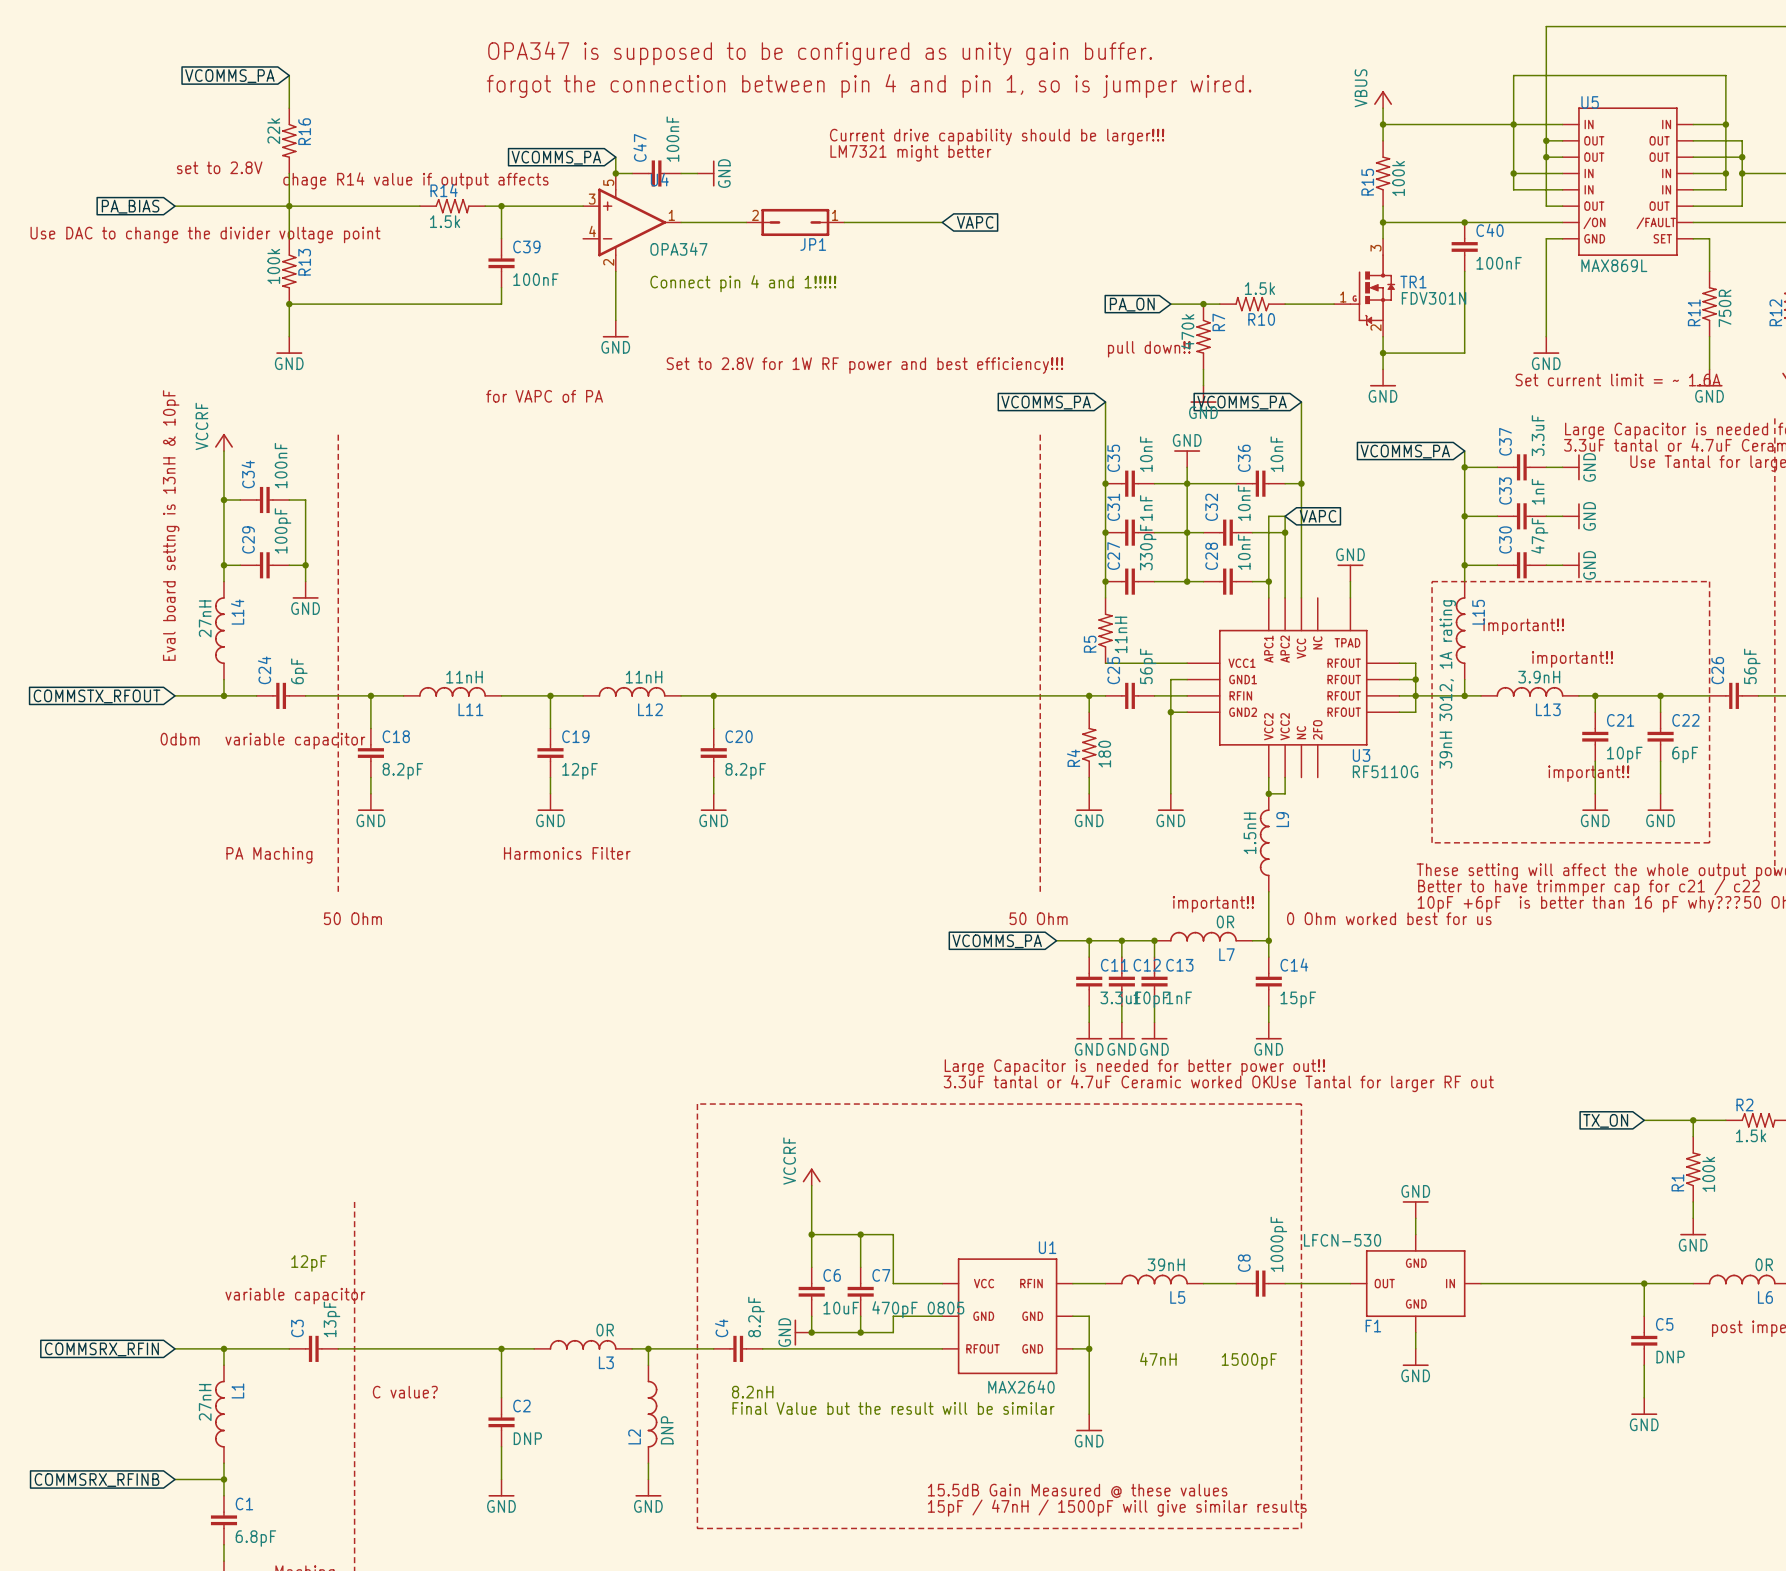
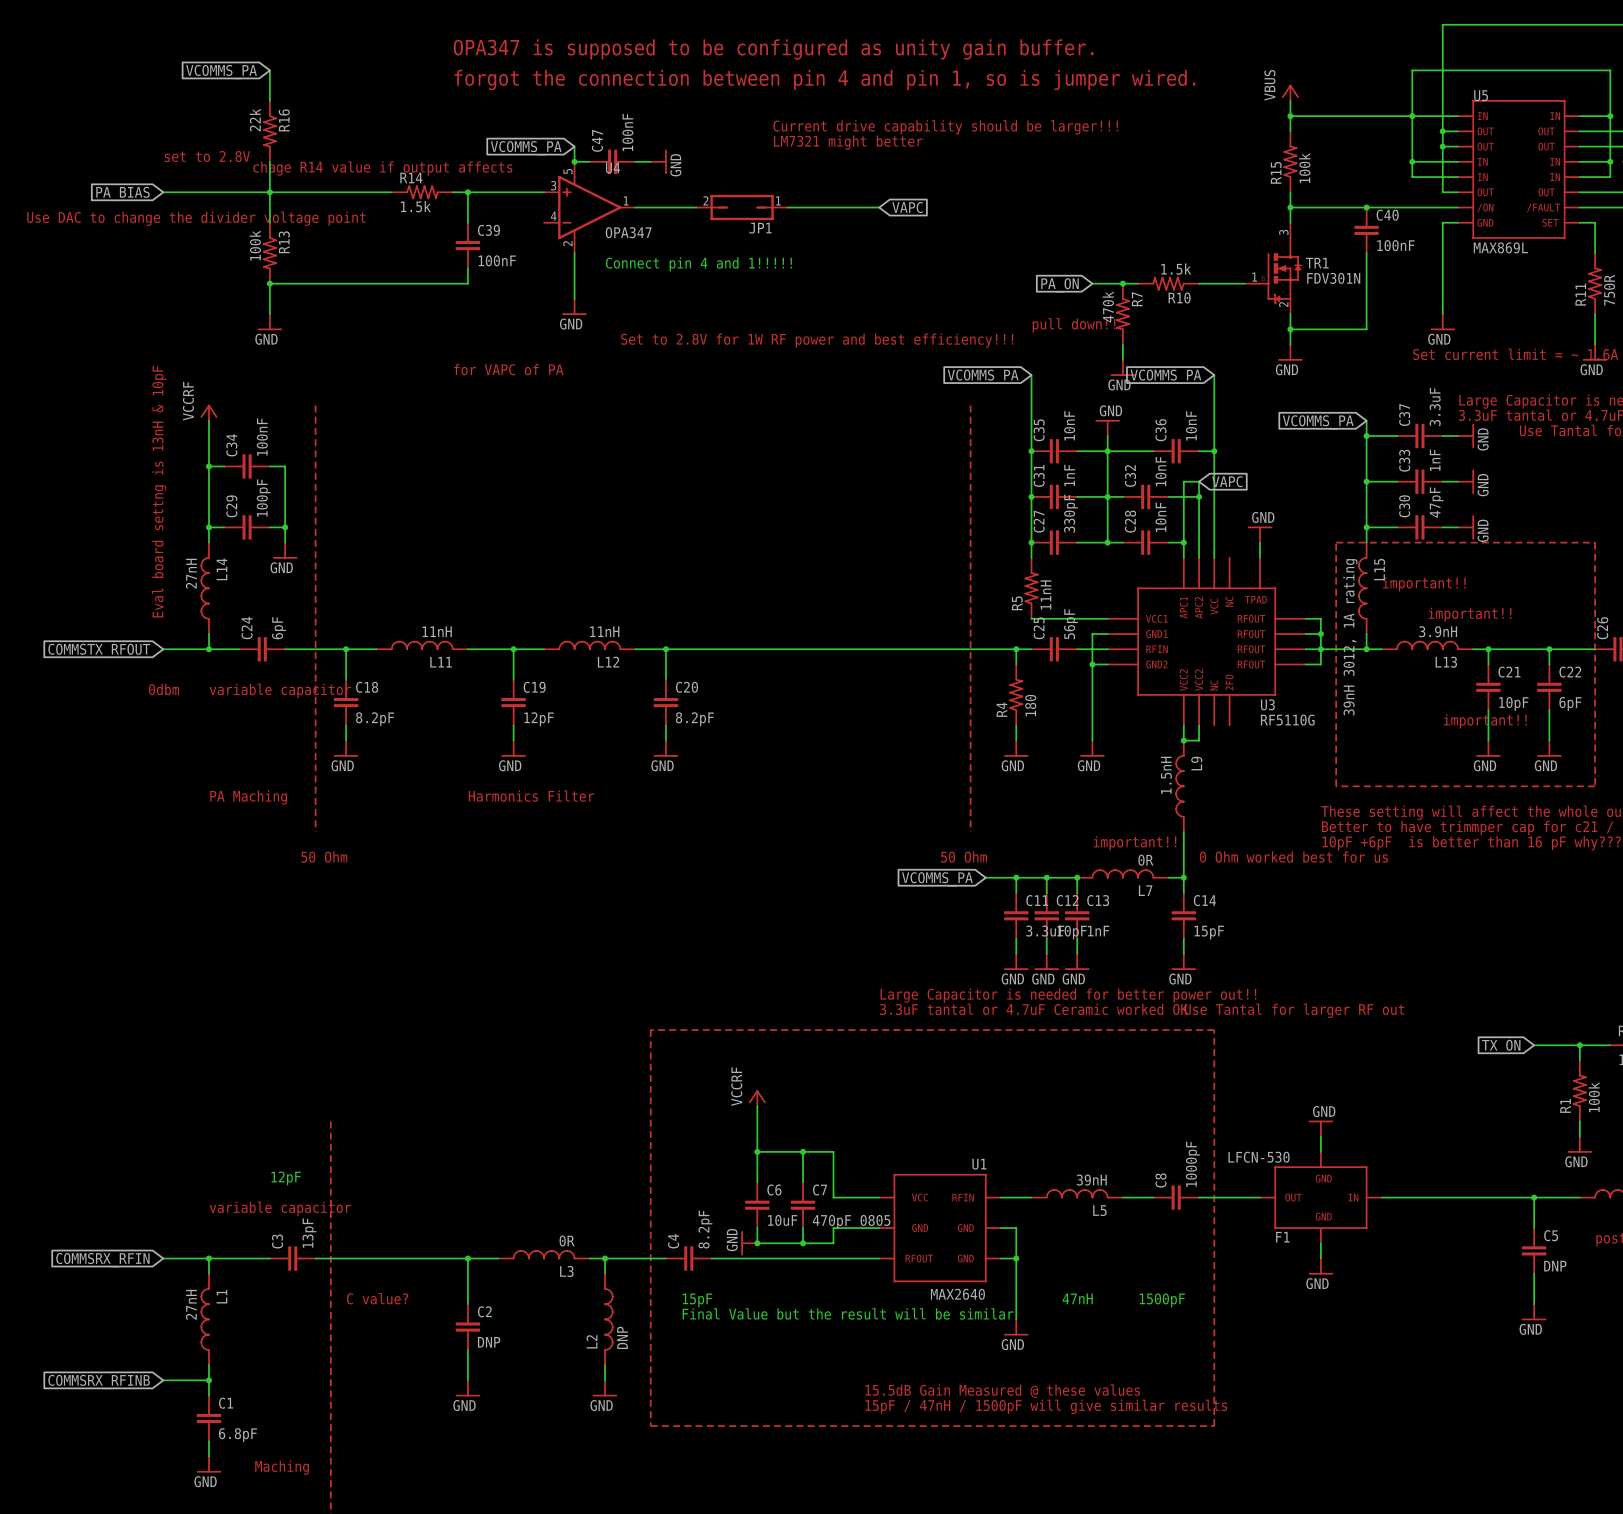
text position: 47nH (1158, 1359) -> 47nH (1077, 1298)
text position: 1500pF (1249, 1361) -> 1500pF (1162, 1300)
text: 8.2nH (752, 1392) -> 15pF (697, 1300)

